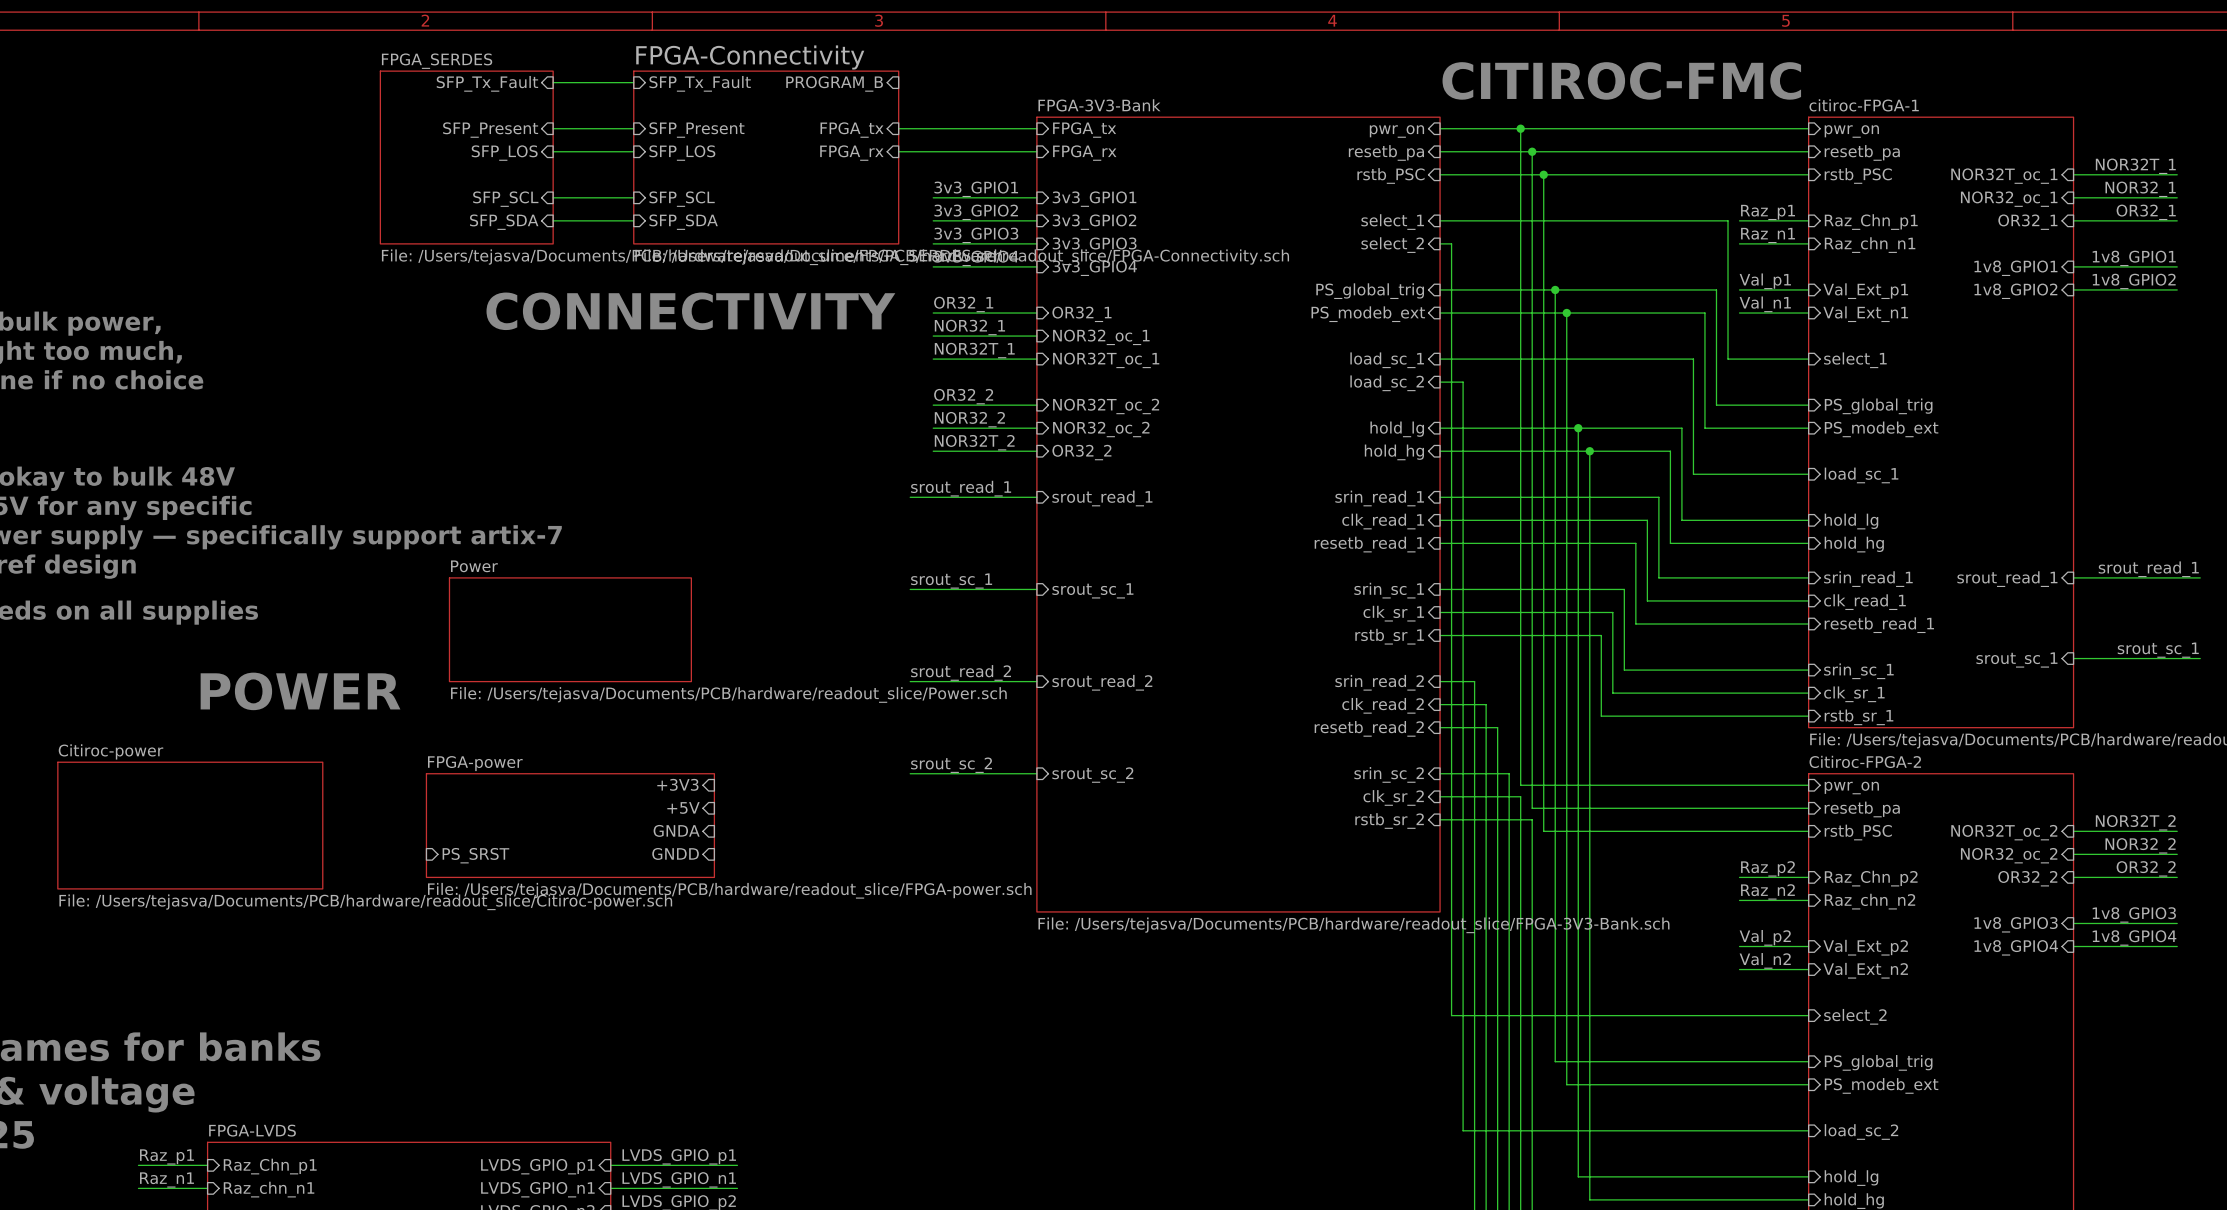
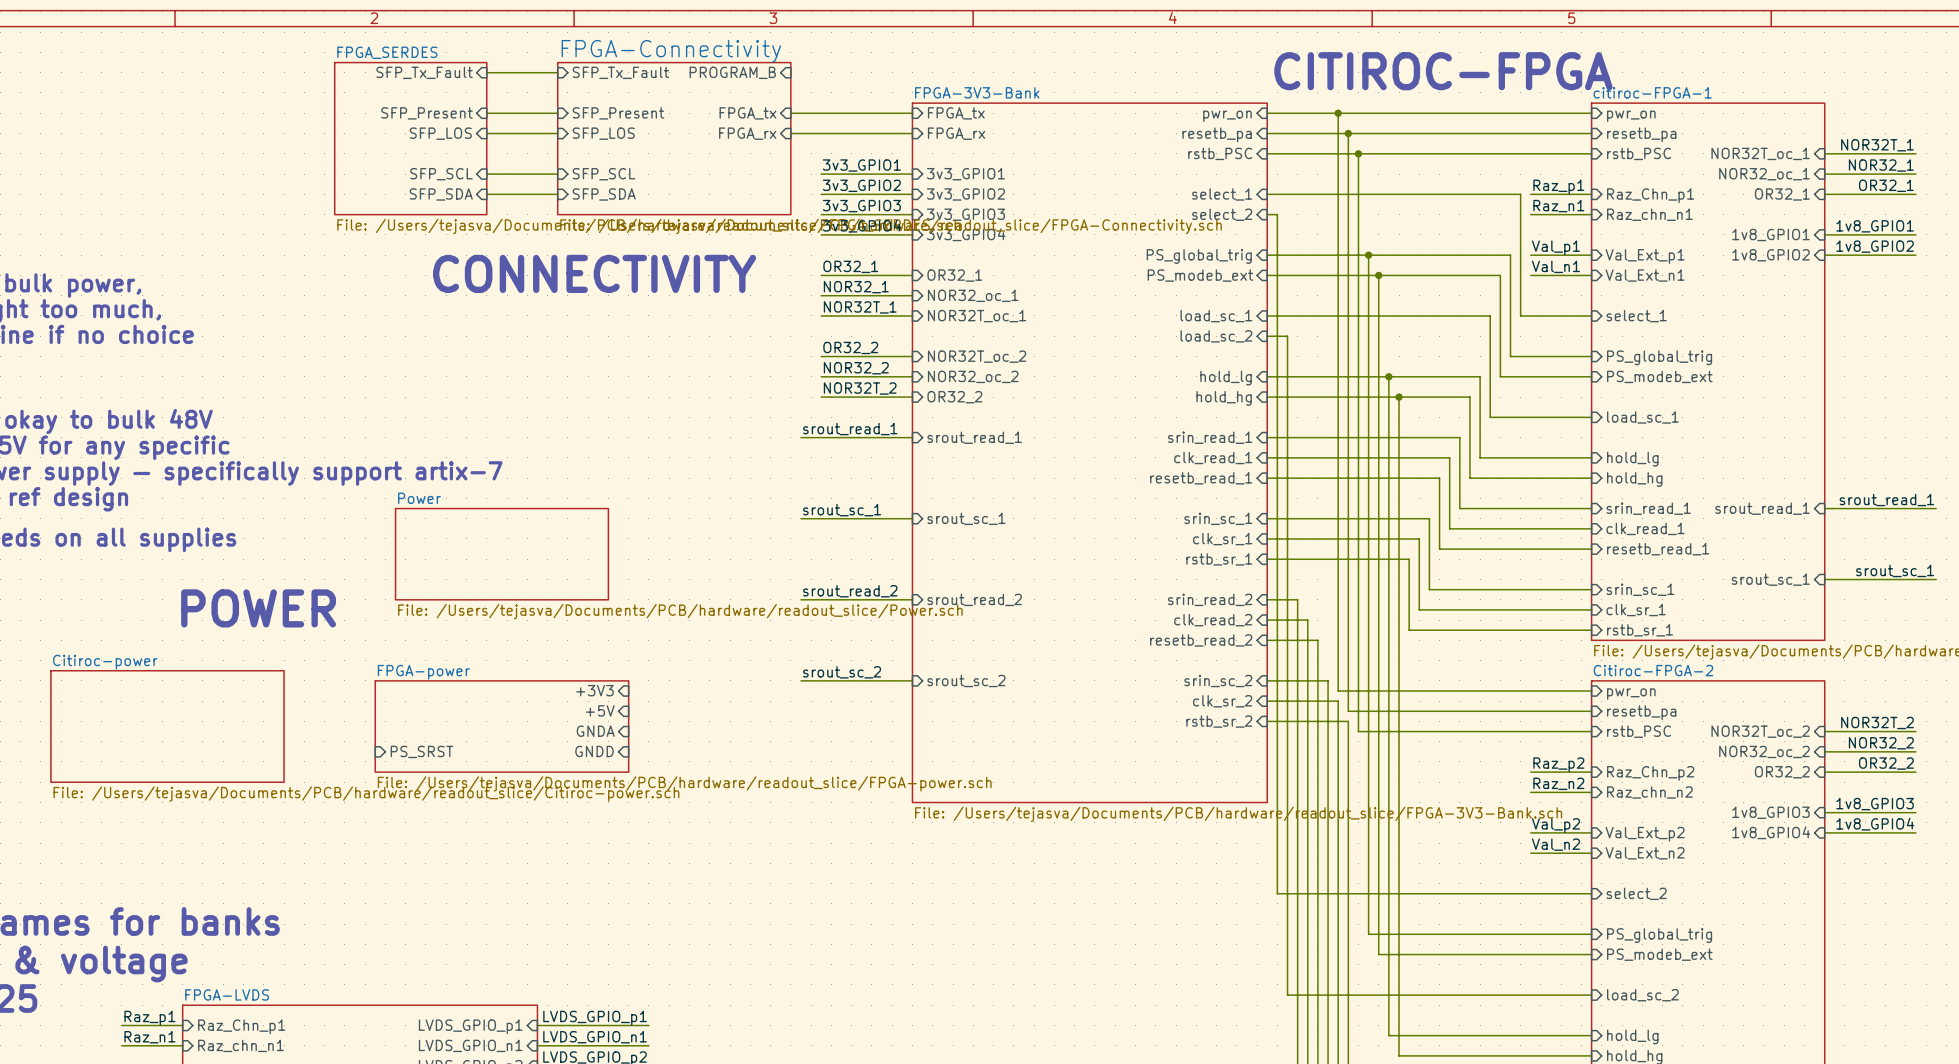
text: CITIROC-FMC (1621, 80) -> CITIROC-FPGA (1443, 71)

